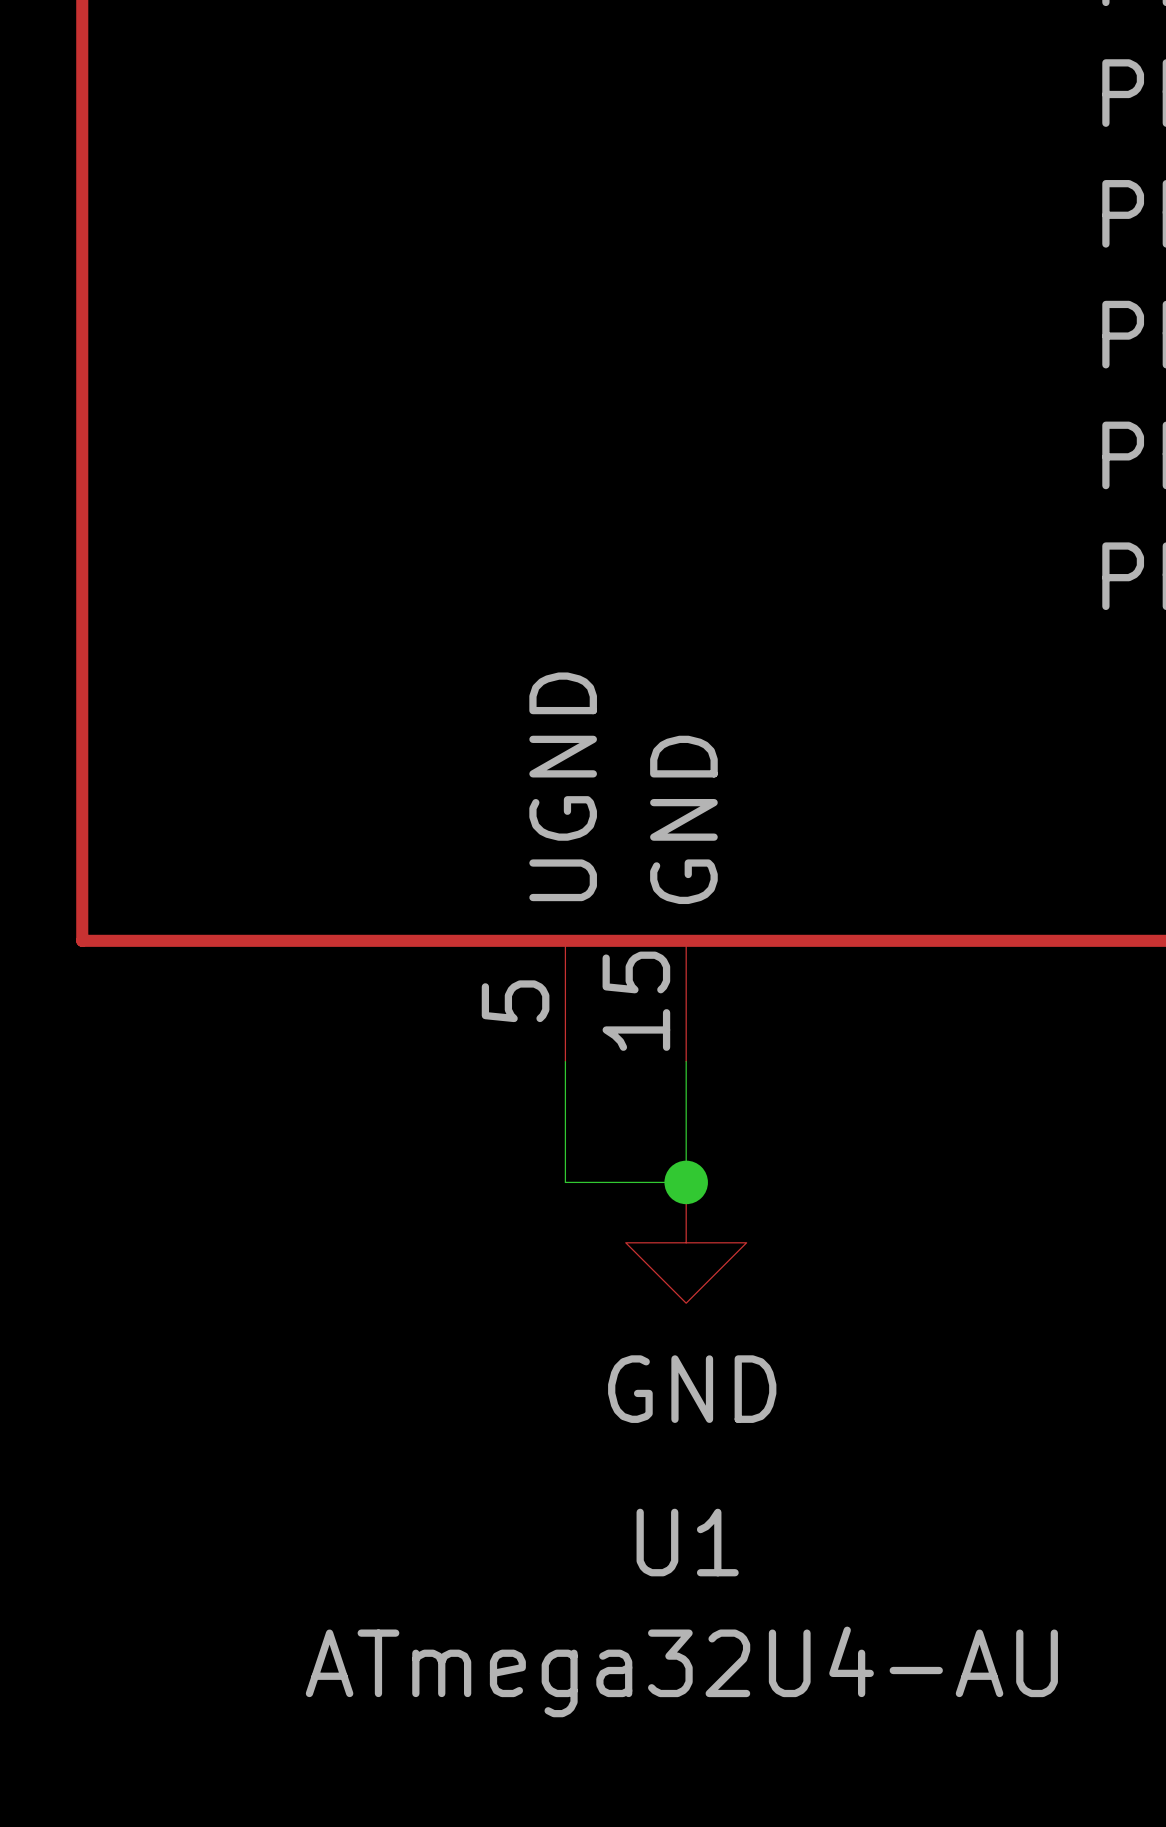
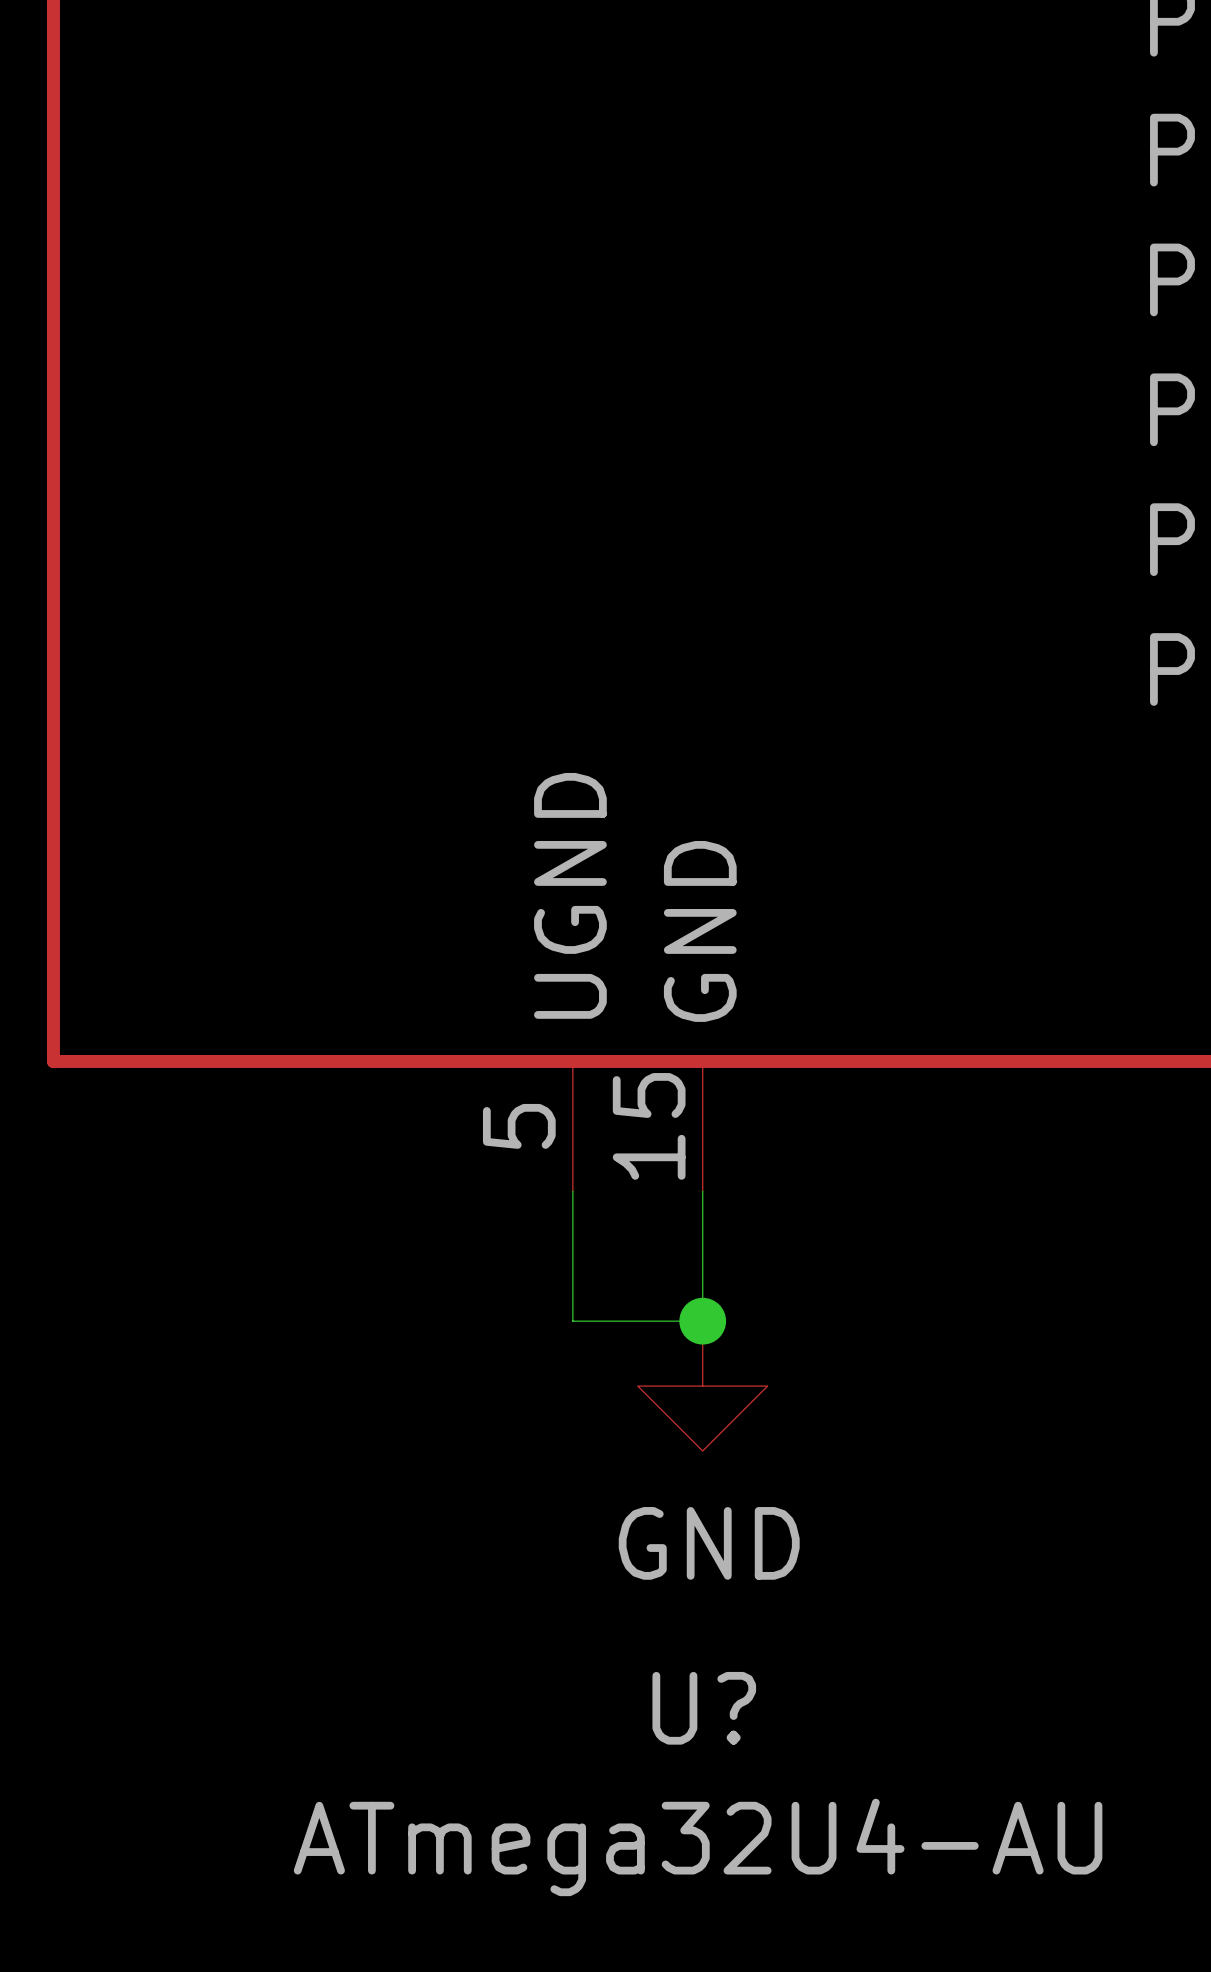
U1 name: U1 (687, 1542) -> U? (704, 1708)

